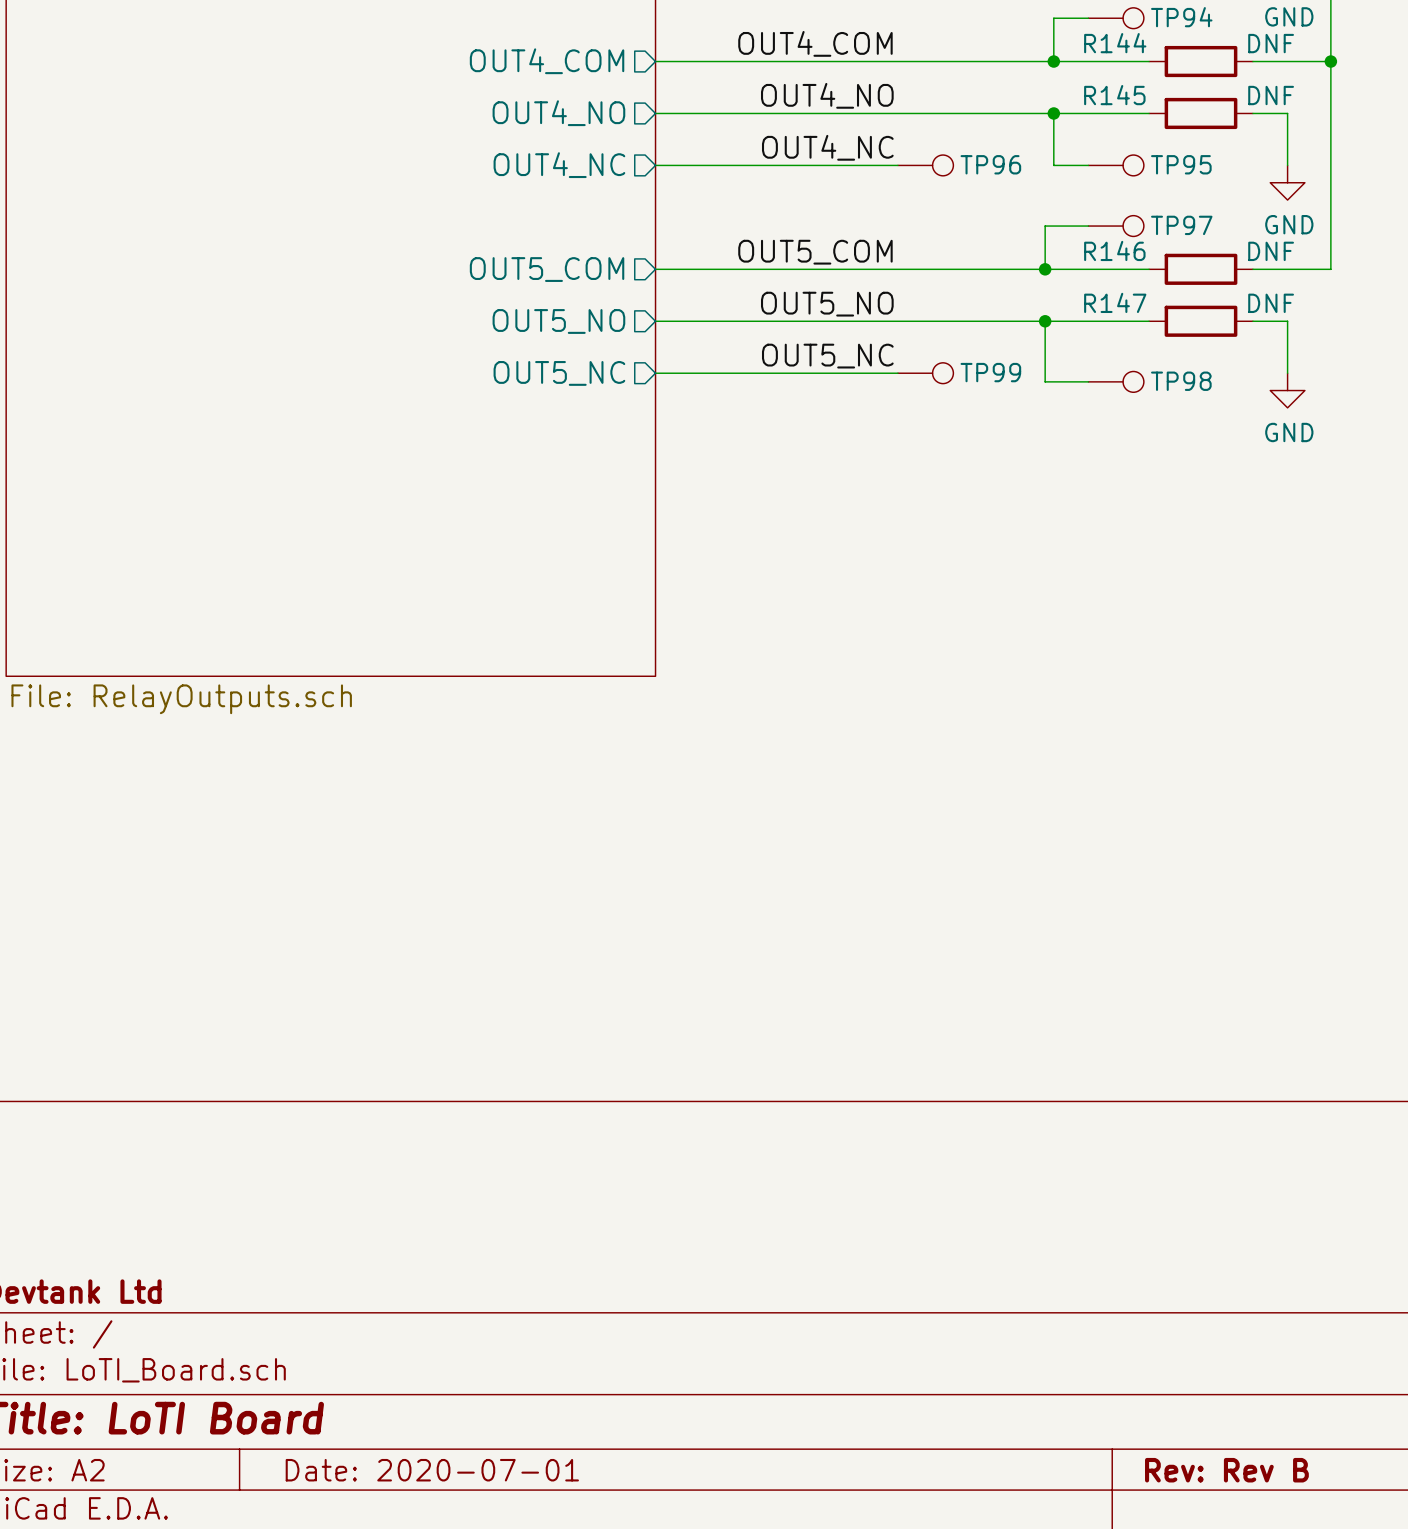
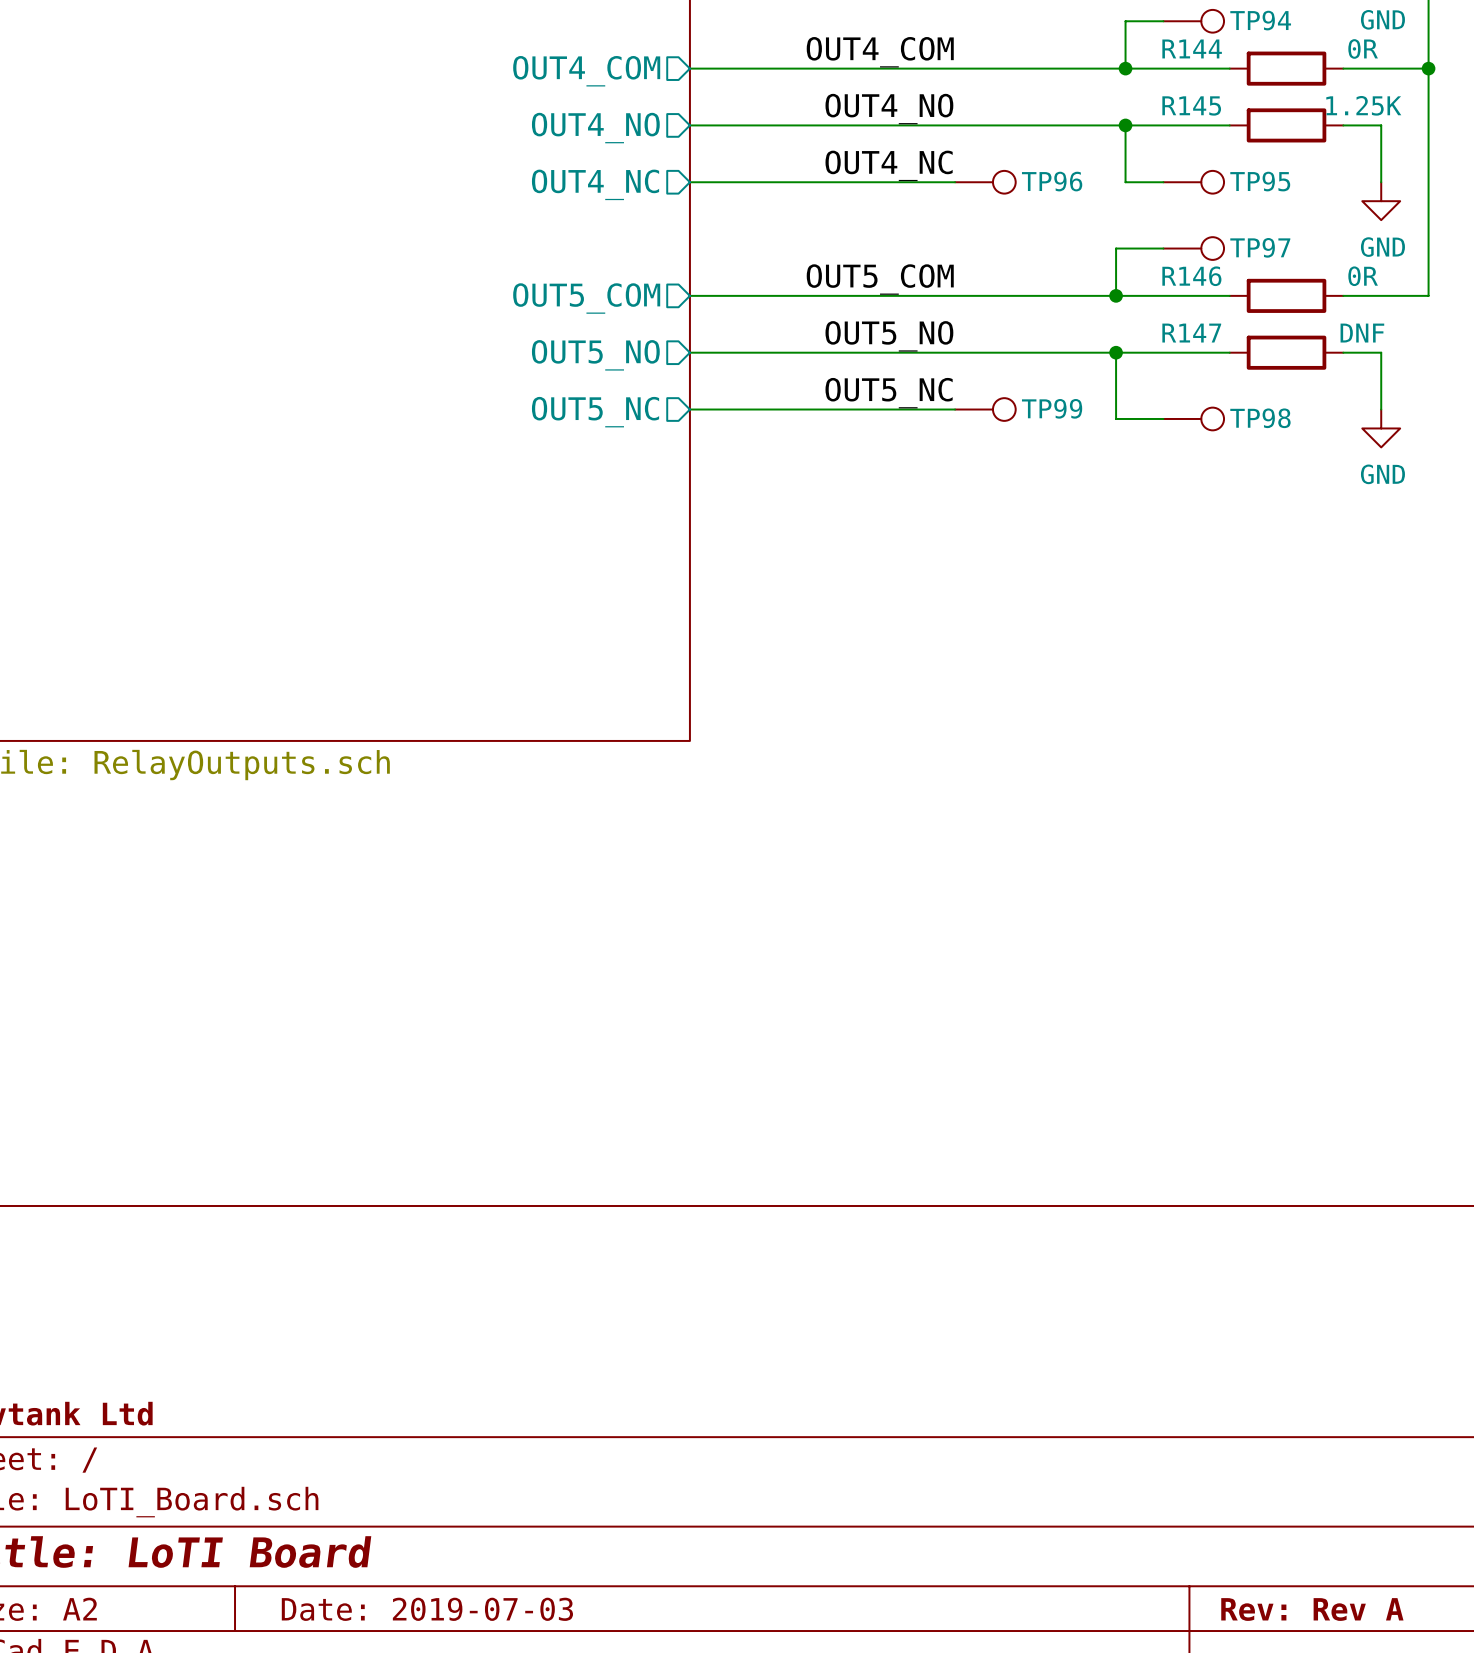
R144 value: DNF (1271, 43) -> 0R (1363, 48)
R145 value: DNF (1271, 95) -> 1.25K (1363, 105)
R146 value: DNF (1271, 251) -> 0R (1363, 276)
title block: Date: 2020-07-01 (432, 1470) -> Date: 2019-07-03 (427, 1609)
title block: Rev: Rev B (1226, 1470) -> Rev: Rev A (1312, 1609)

